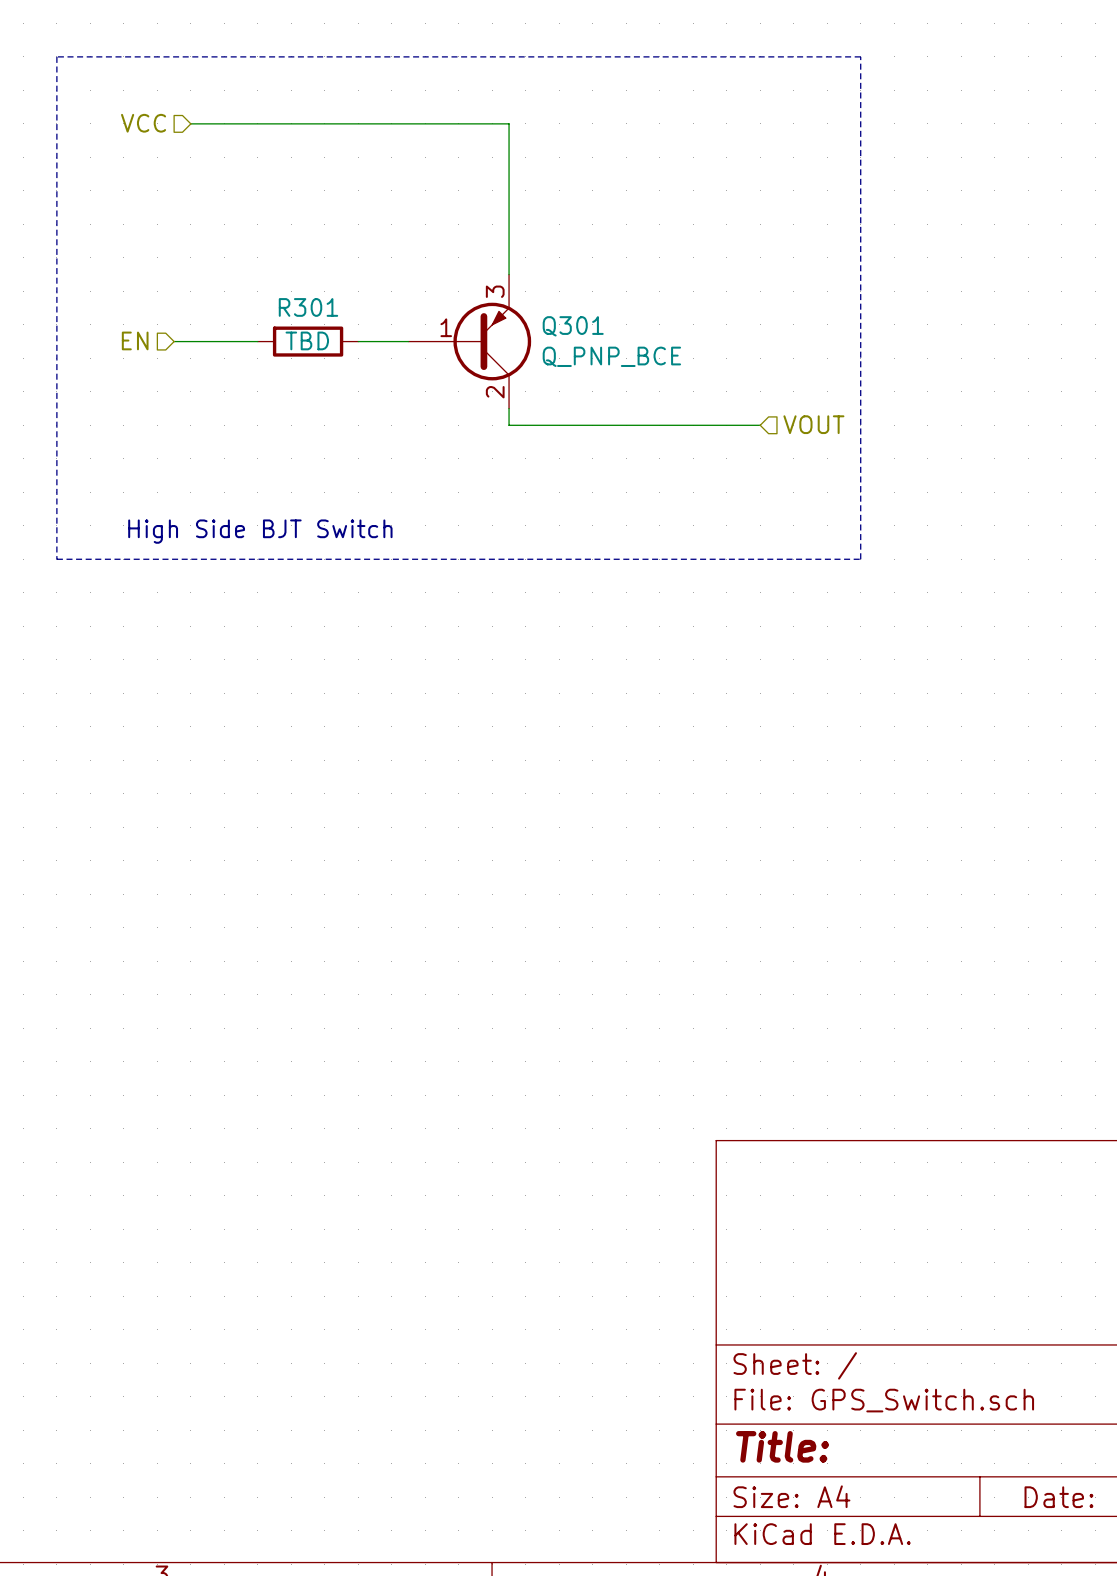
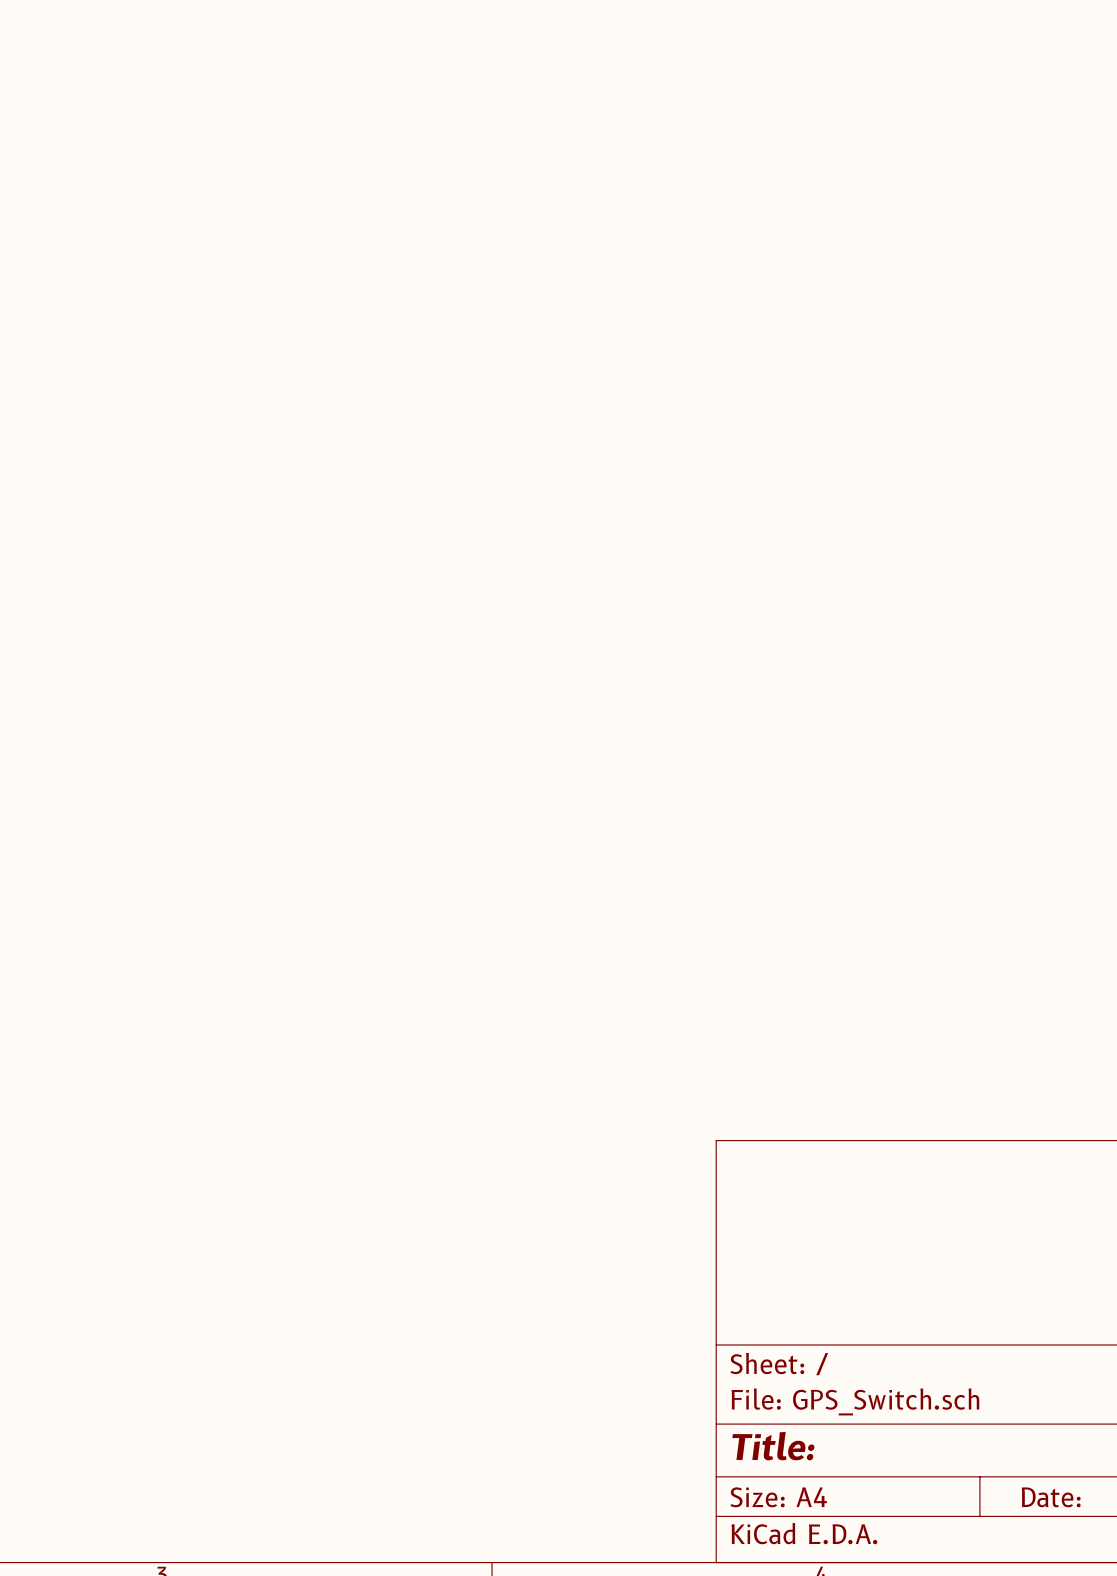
line: (56, 56) (860, 56) (860, 559) (56, 559) (56, 56) -> none
hierarchical label: VCC (143, 123) -> none
wire: (190, 123) (509, 123) (509, 274) -> none
hierarchical label: EN (135, 340) -> none
wire: (174, 341) (257, 341) -> none
R301: TBD (308, 341) -> none
wire: (358, 341) (408, 341) -> none
Q301: Q_PNP_BCE (469, 341) -> none
wire: (509, 408) (509, 425) (760, 425) -> none
hierarchical label: VOUT (813, 424) -> none
text: High Side BJT Switch (260, 531) -> none

